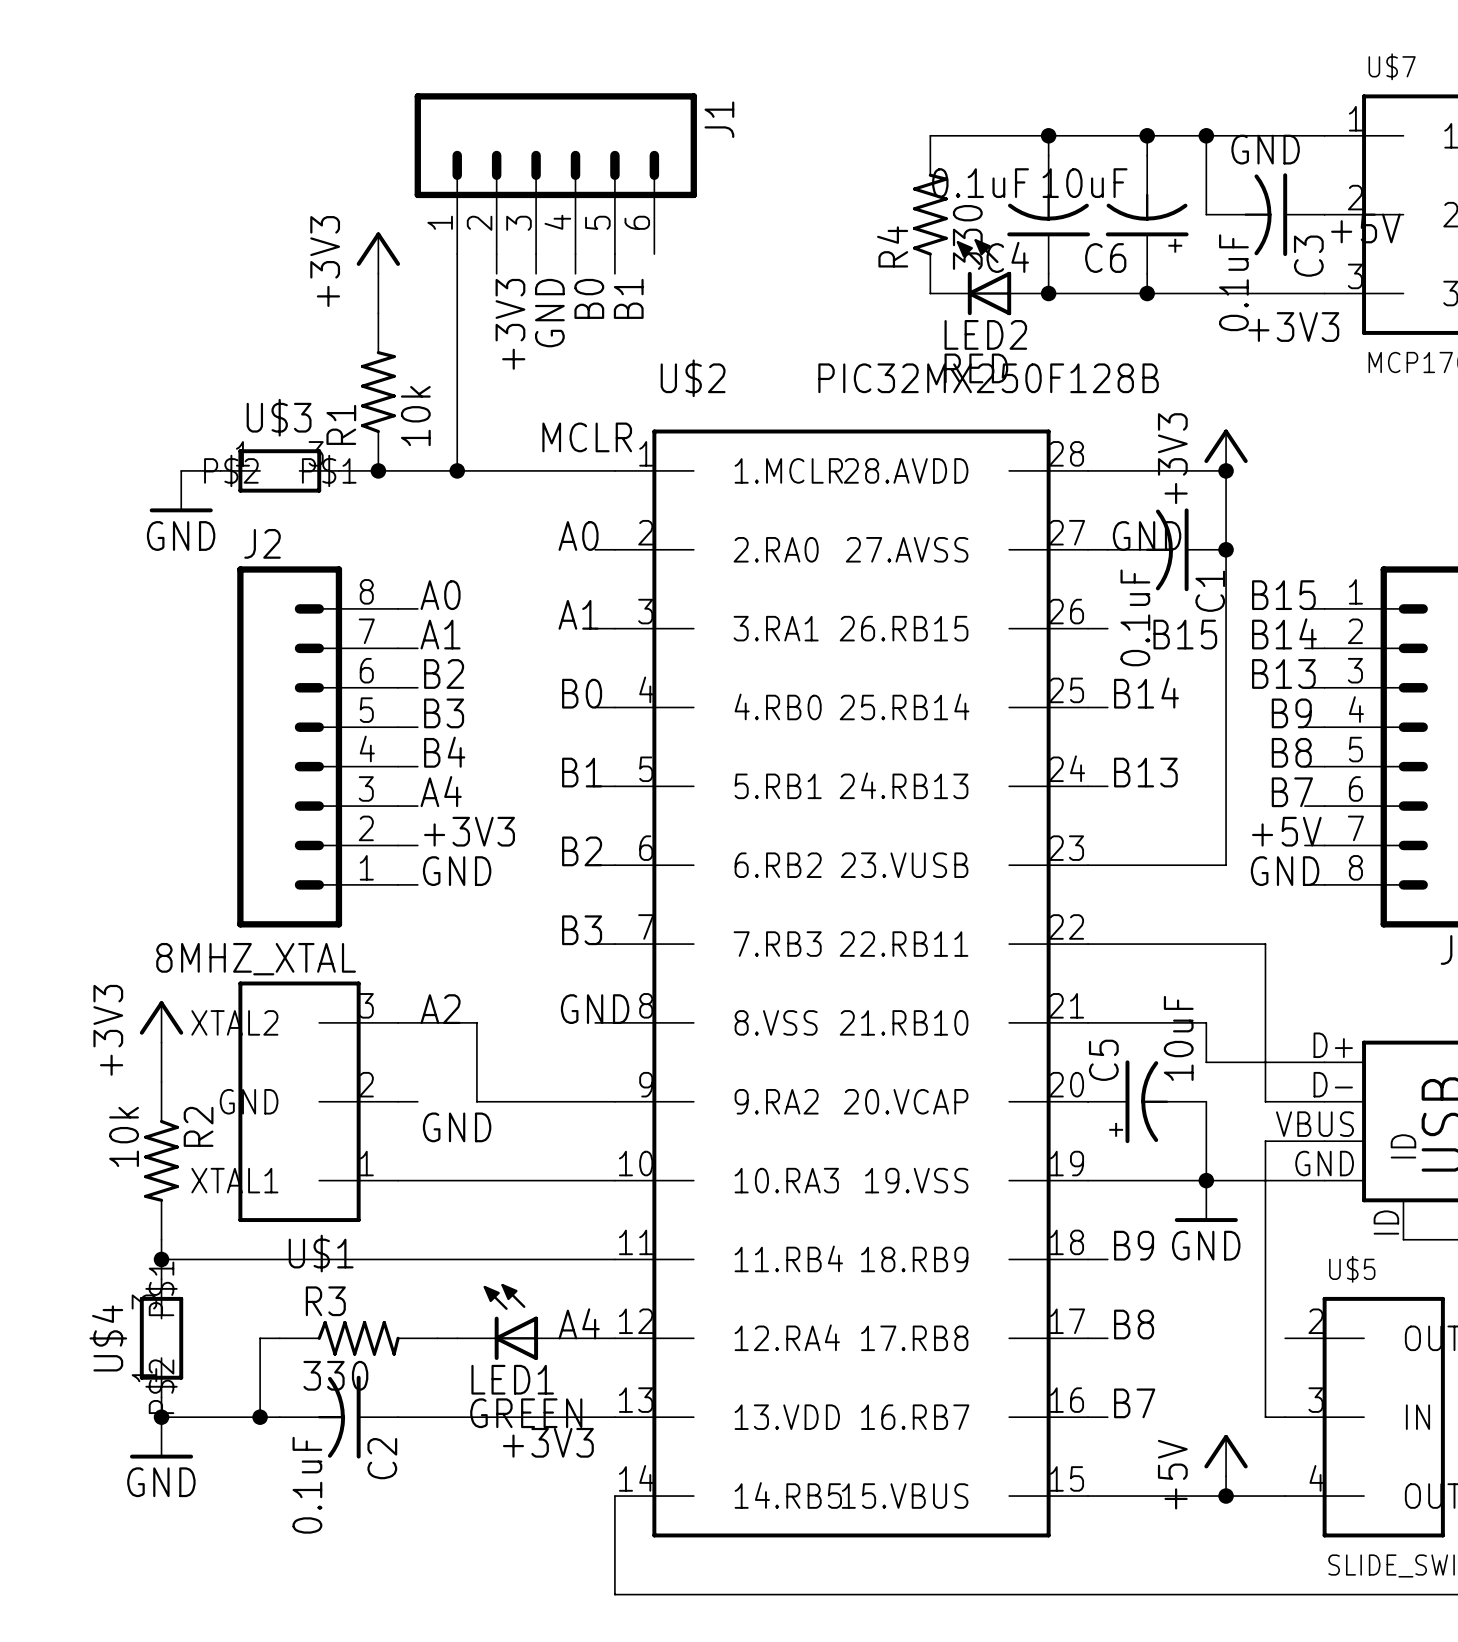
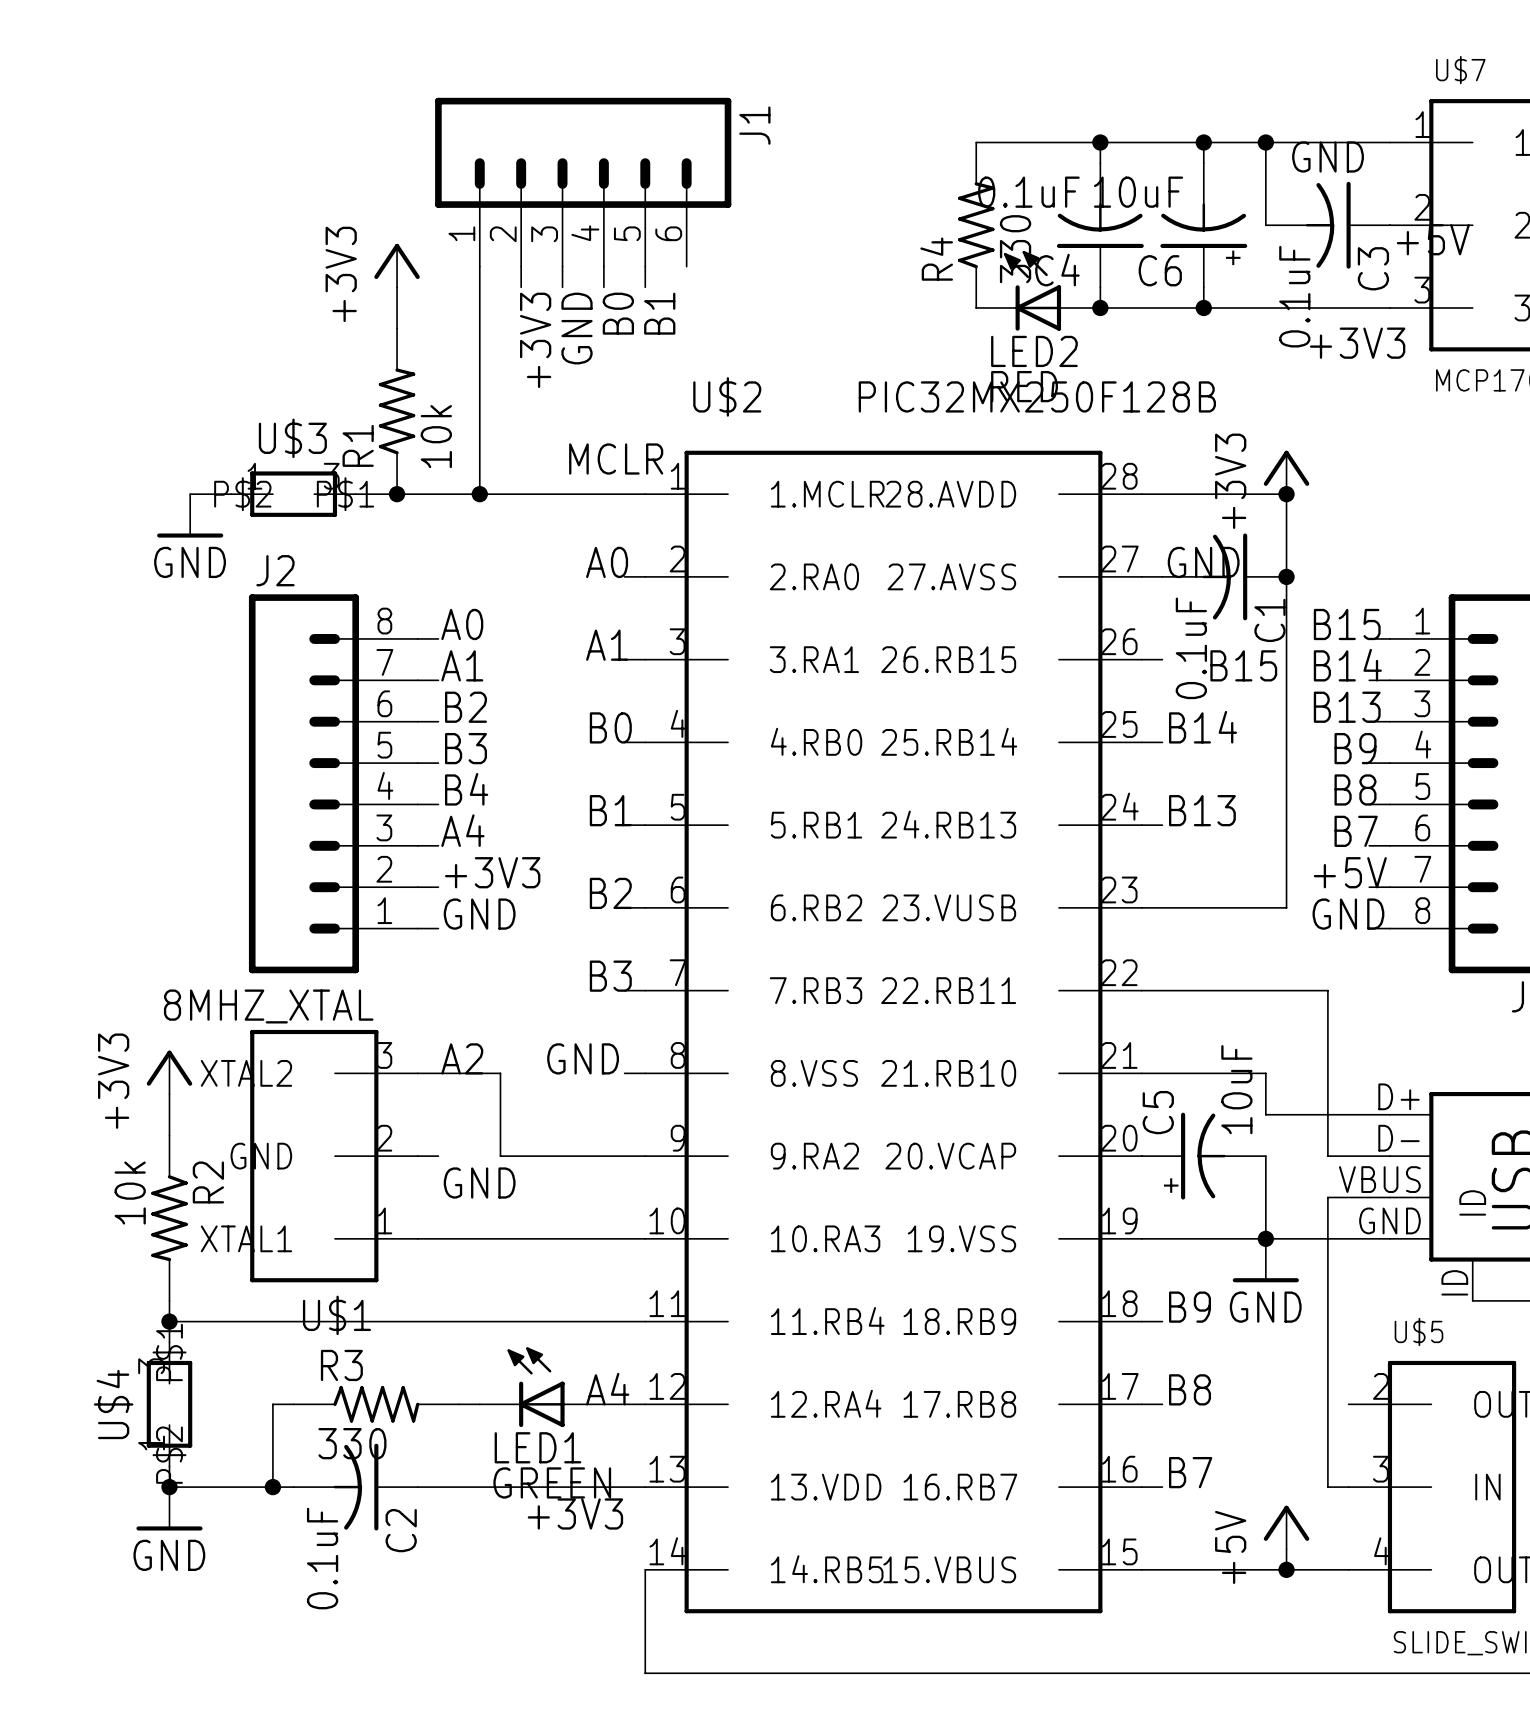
label position: GND (595, 1009) -> GND (583, 1058)

